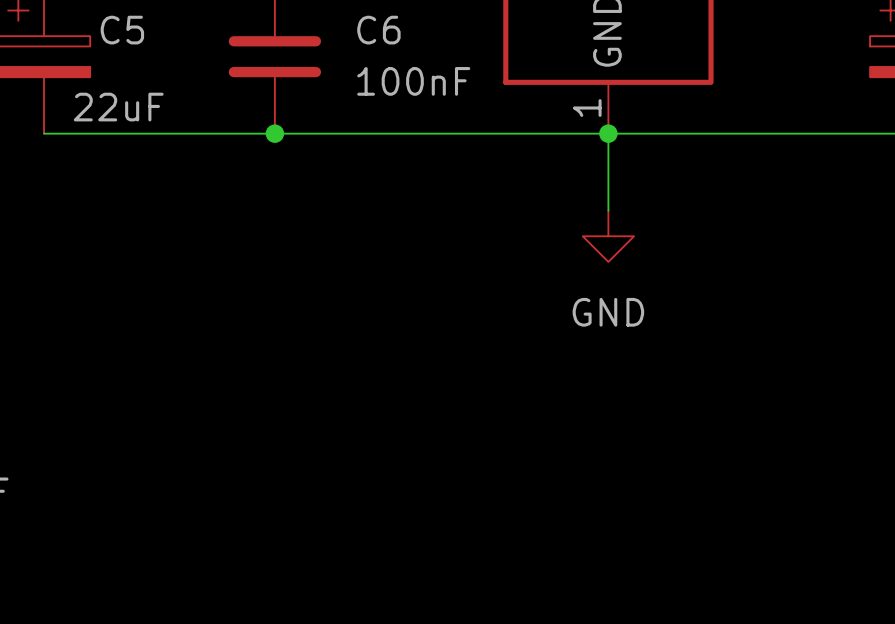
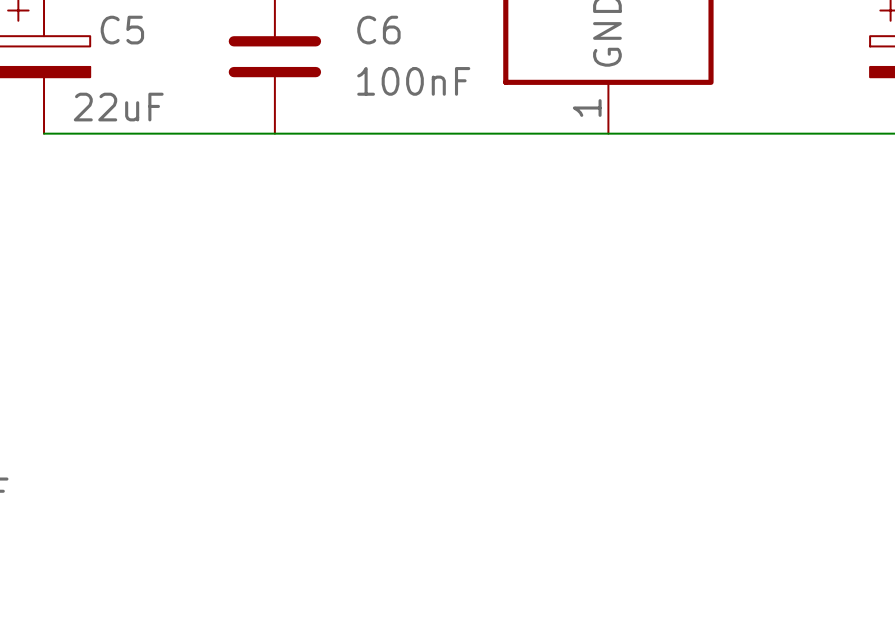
junction: (274, 133) -> none
wire: (608, 133) (608, 210) -> none
junction: (608, 133) -> none
power symbol: GND (608, 236) -> none

